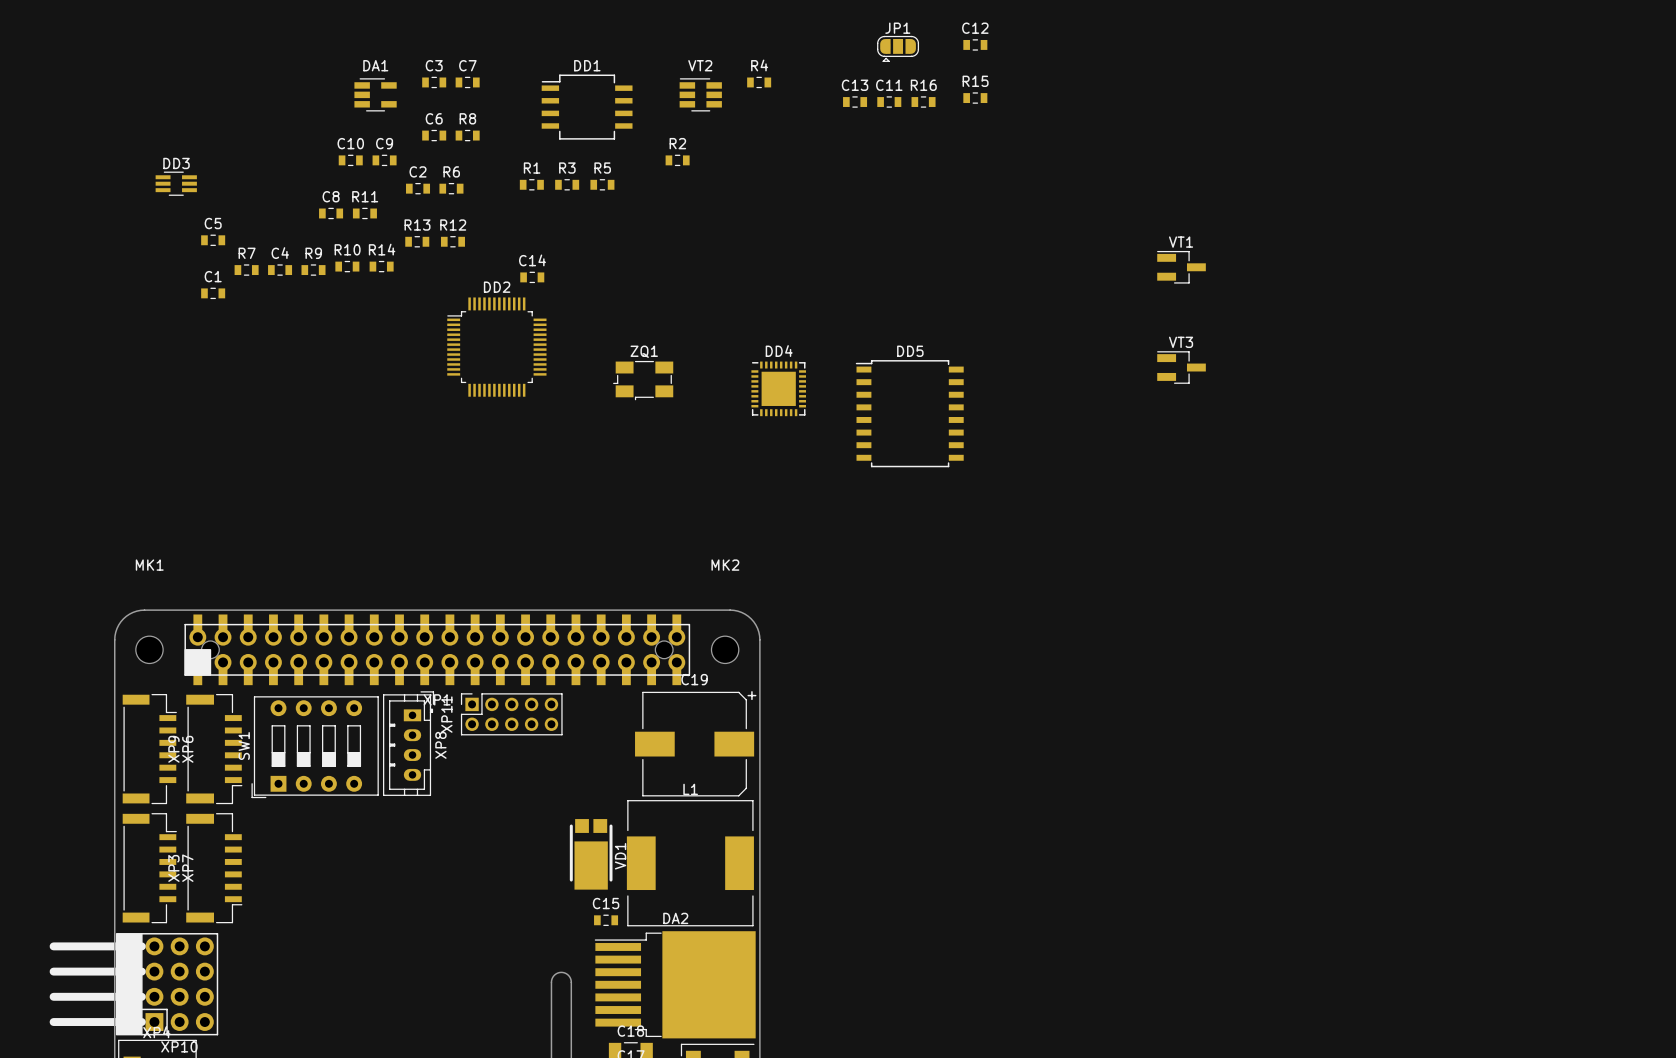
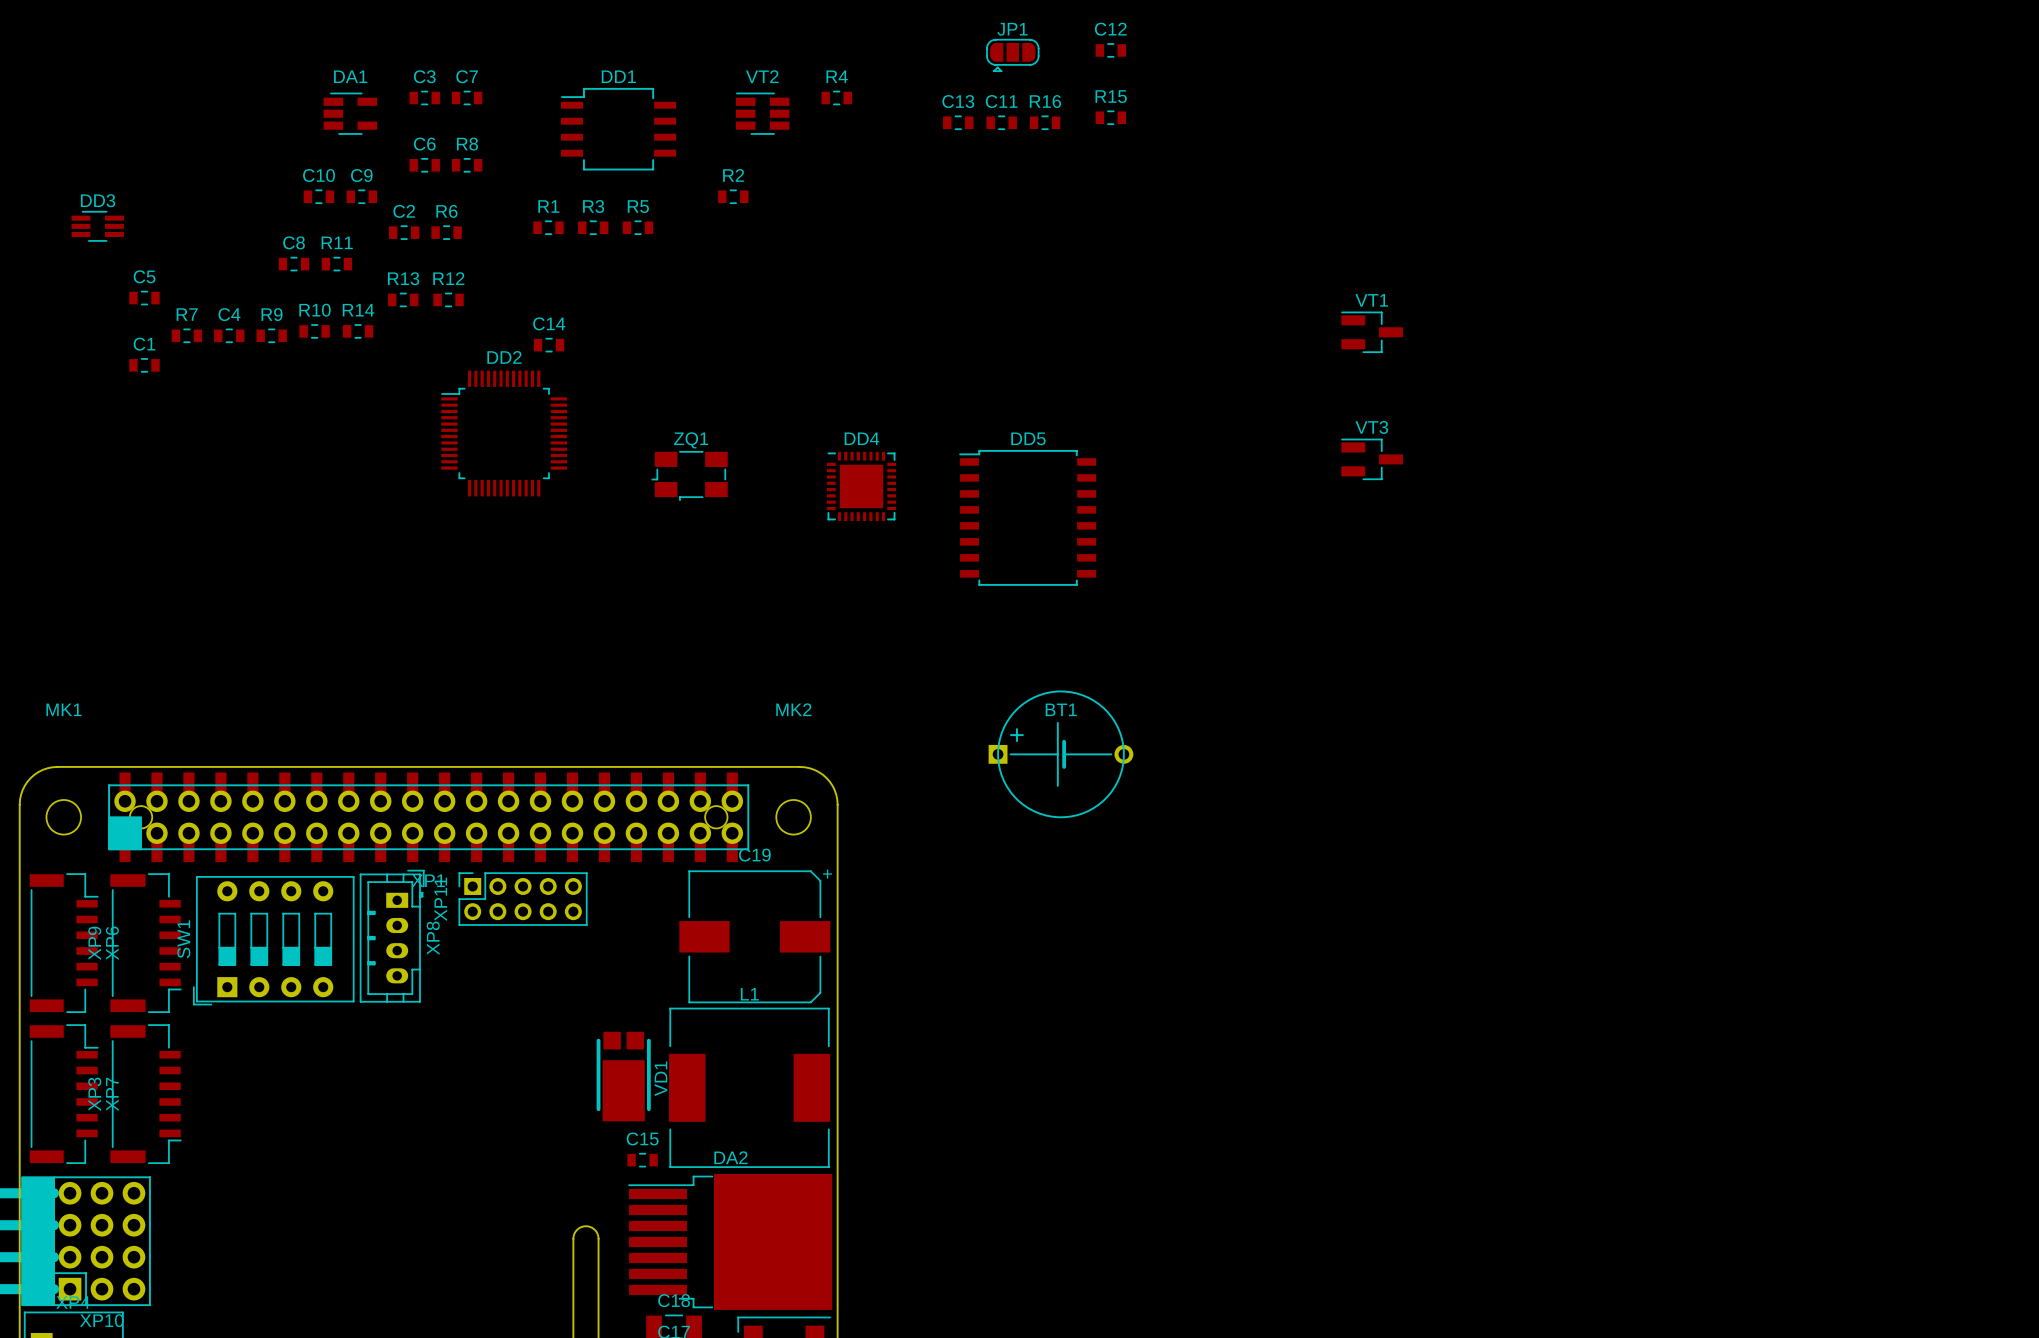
BT1: none -> (1060, 754)

